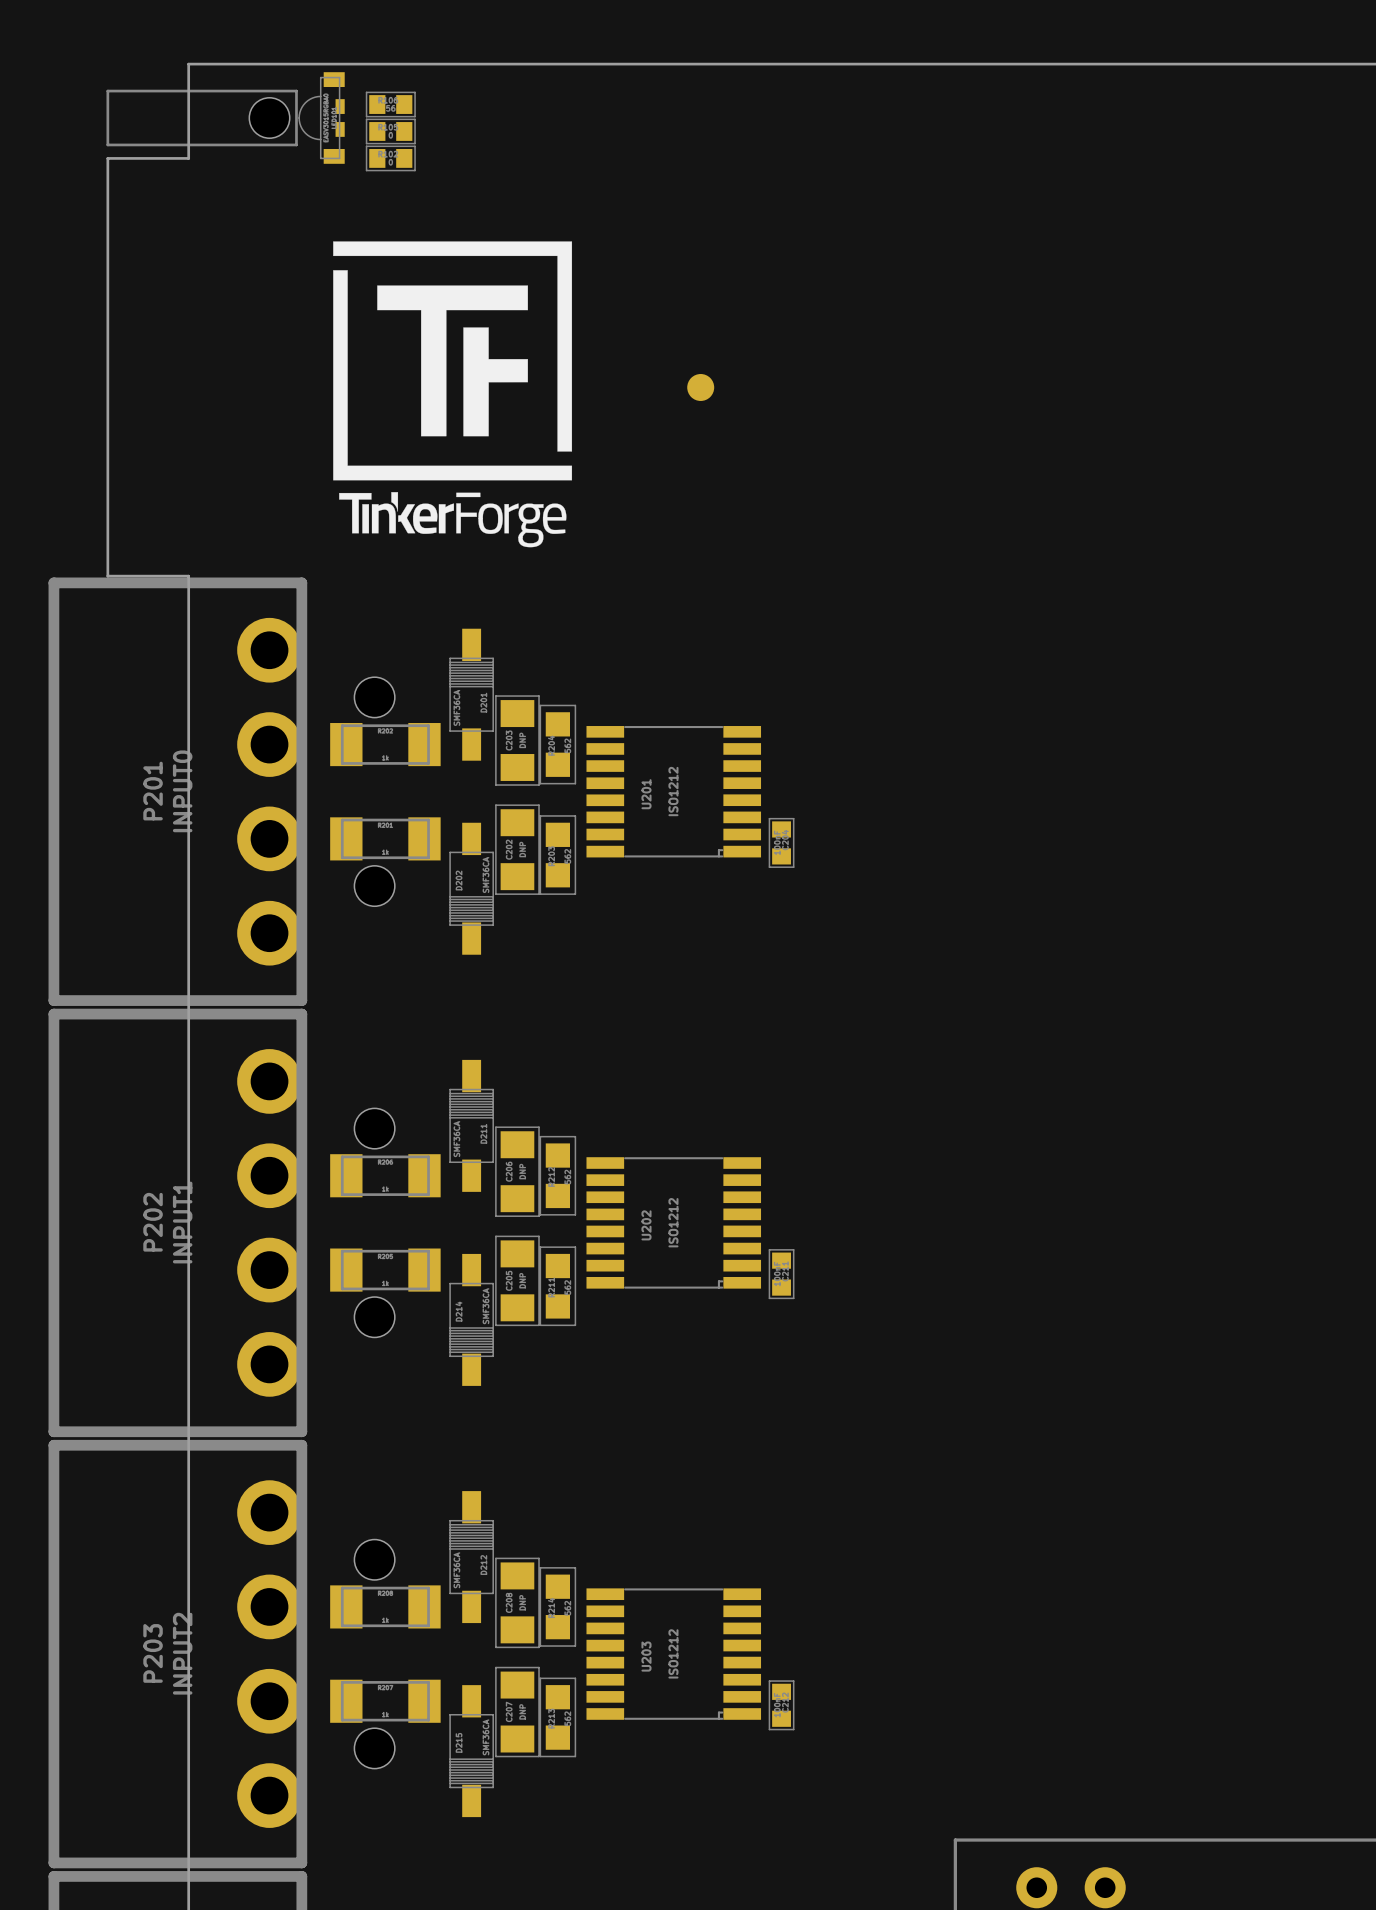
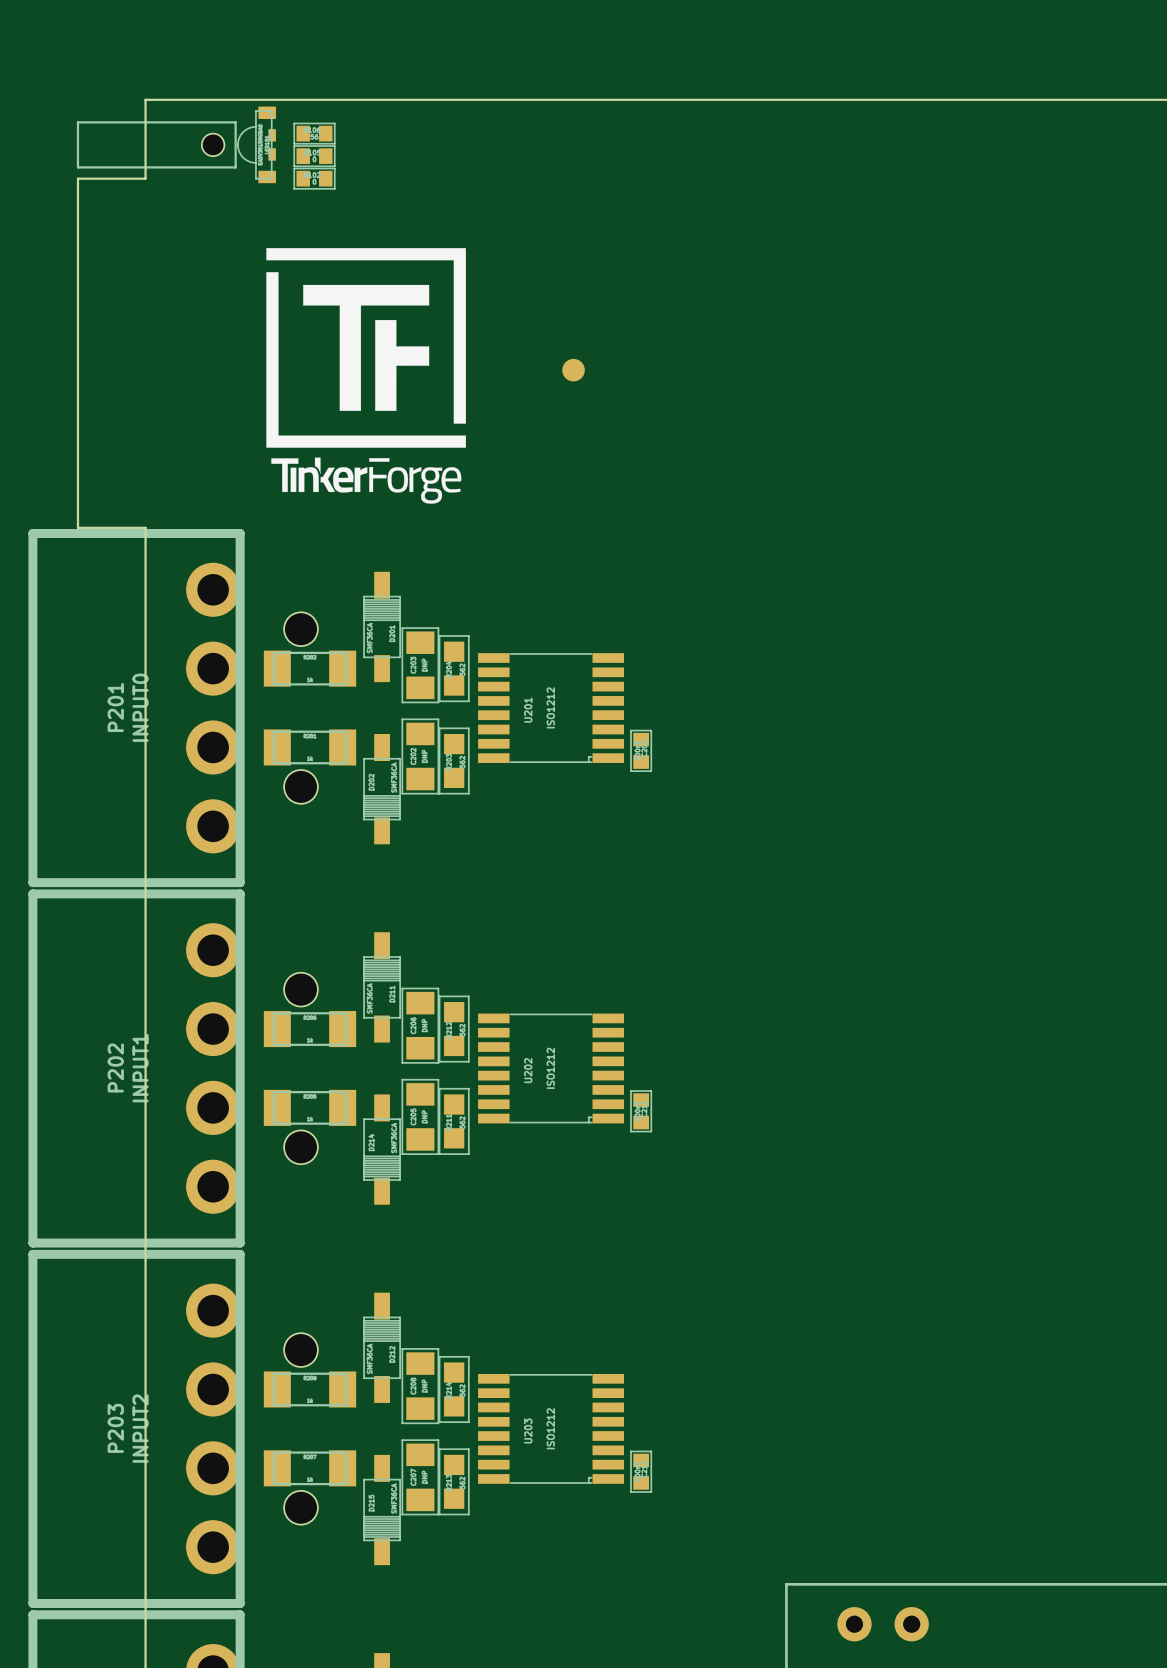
part footprint: [106, 72, 345, 164] -> [76, 106, 276, 184]

